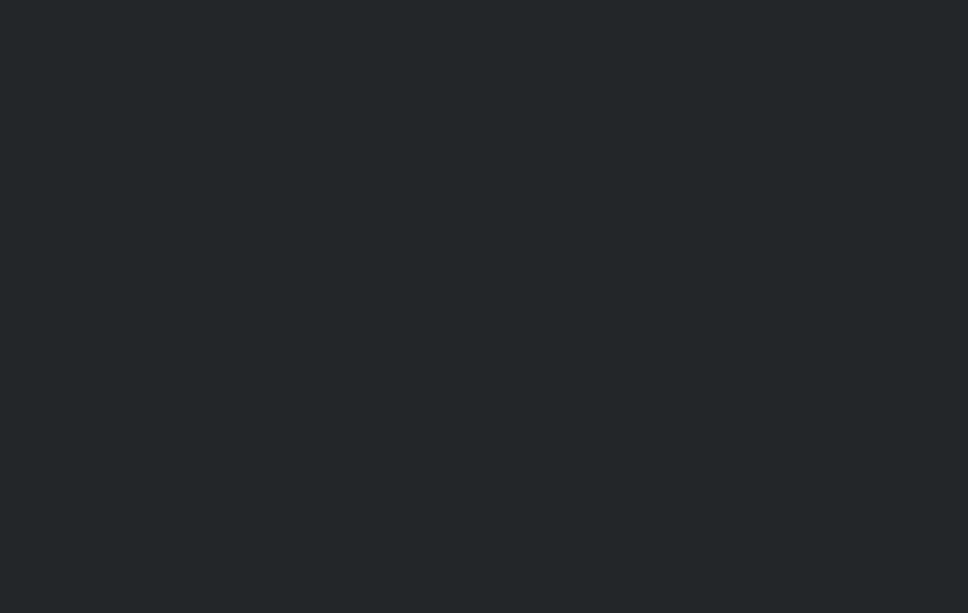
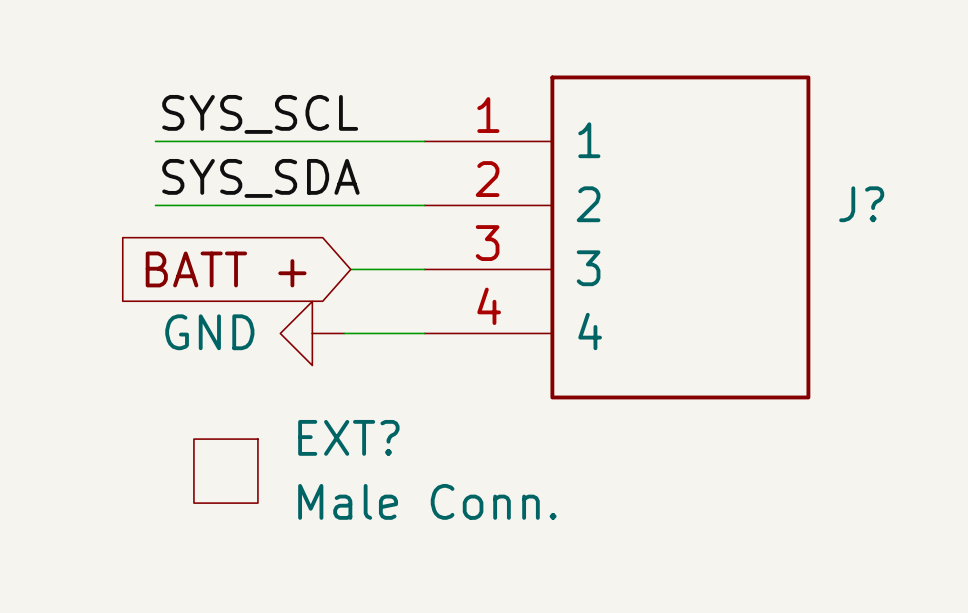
label: none -> SYS_SCL (260, 114)
wire: none -> (155, 141) (424, 141)
label: none -> SYS_SDA (260, 178)
wire: none -> (155, 205) (424, 205)
J?: none -> (617, 237)
global label: none -> BATT + (226, 269)
wire: none -> (350, 269) (424, 269)
power symbol: none -> GND (312, 333)
wire: none -> (344, 333) (424, 333)
EXT?: none -> Male Conn. (225, 471)

